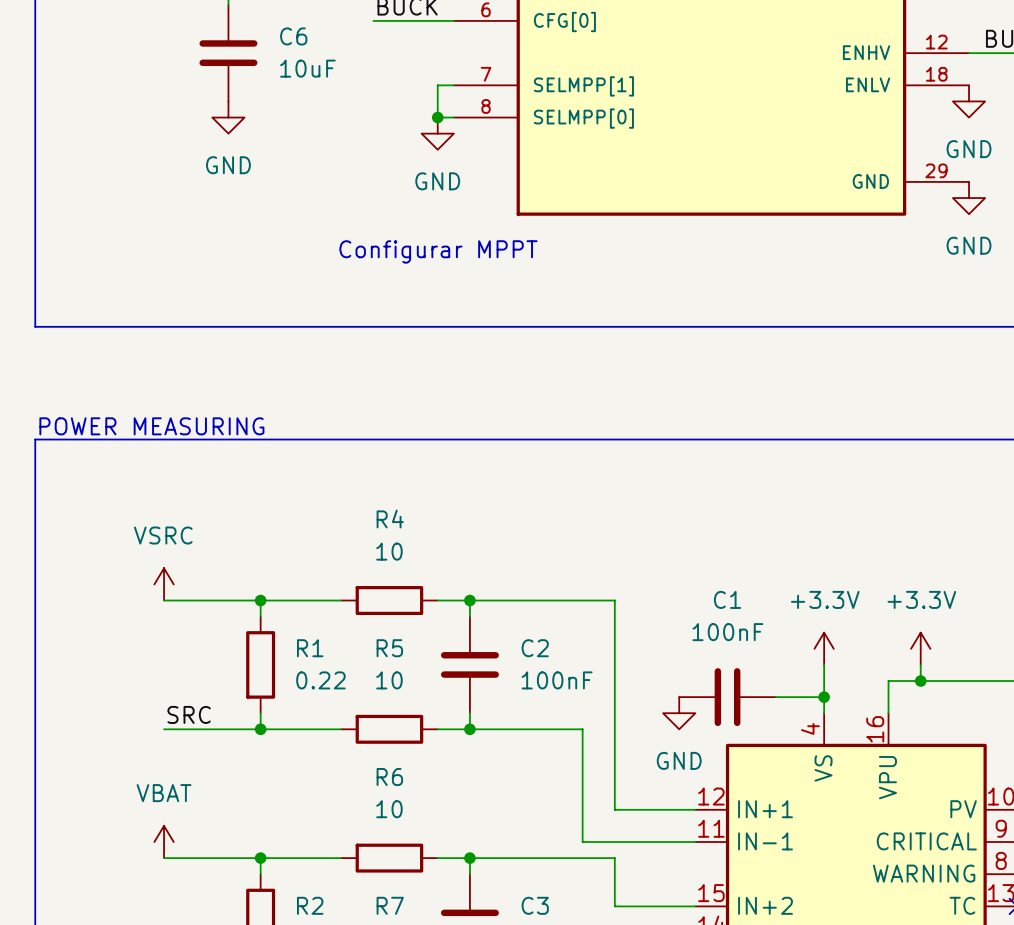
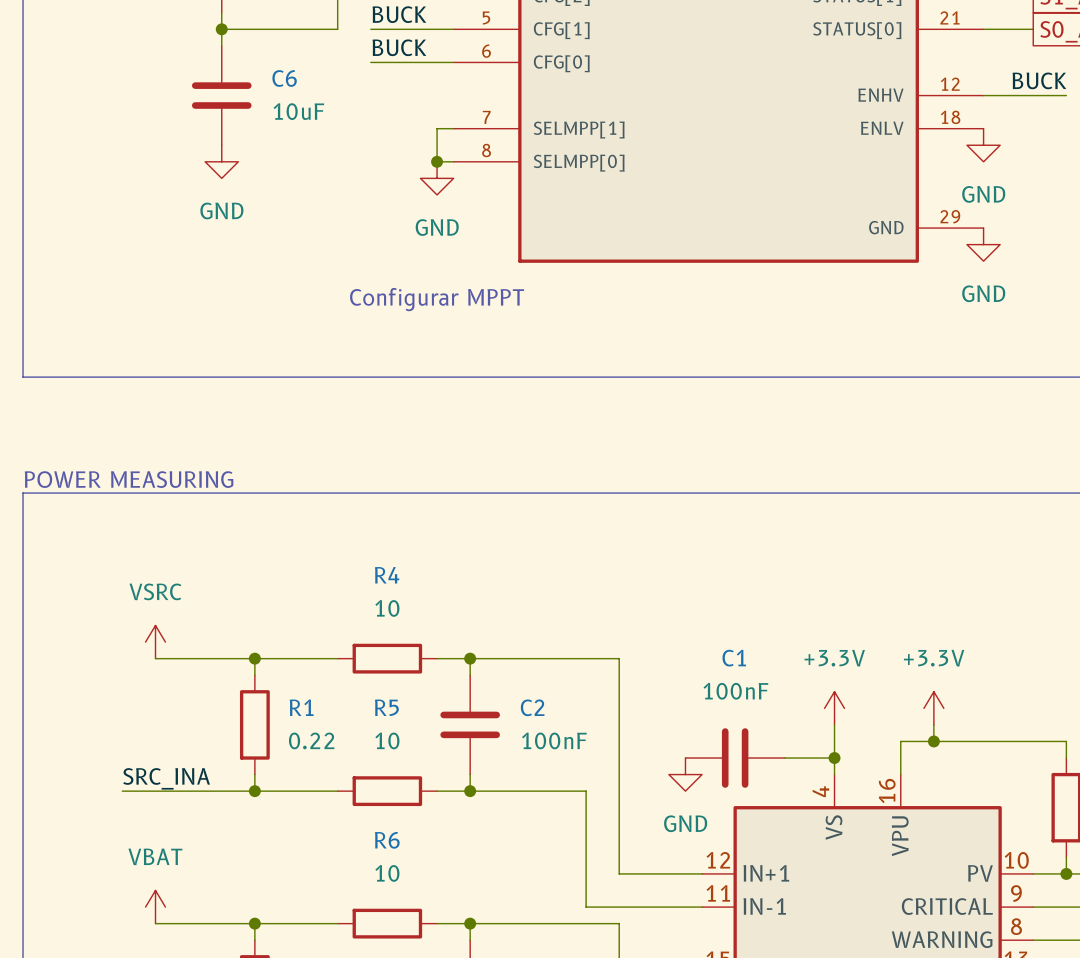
label: SRC (189, 714) -> none
label: none -> SRC_INA (166, 778)
wire: none -> (122, 791) (155, 791)

